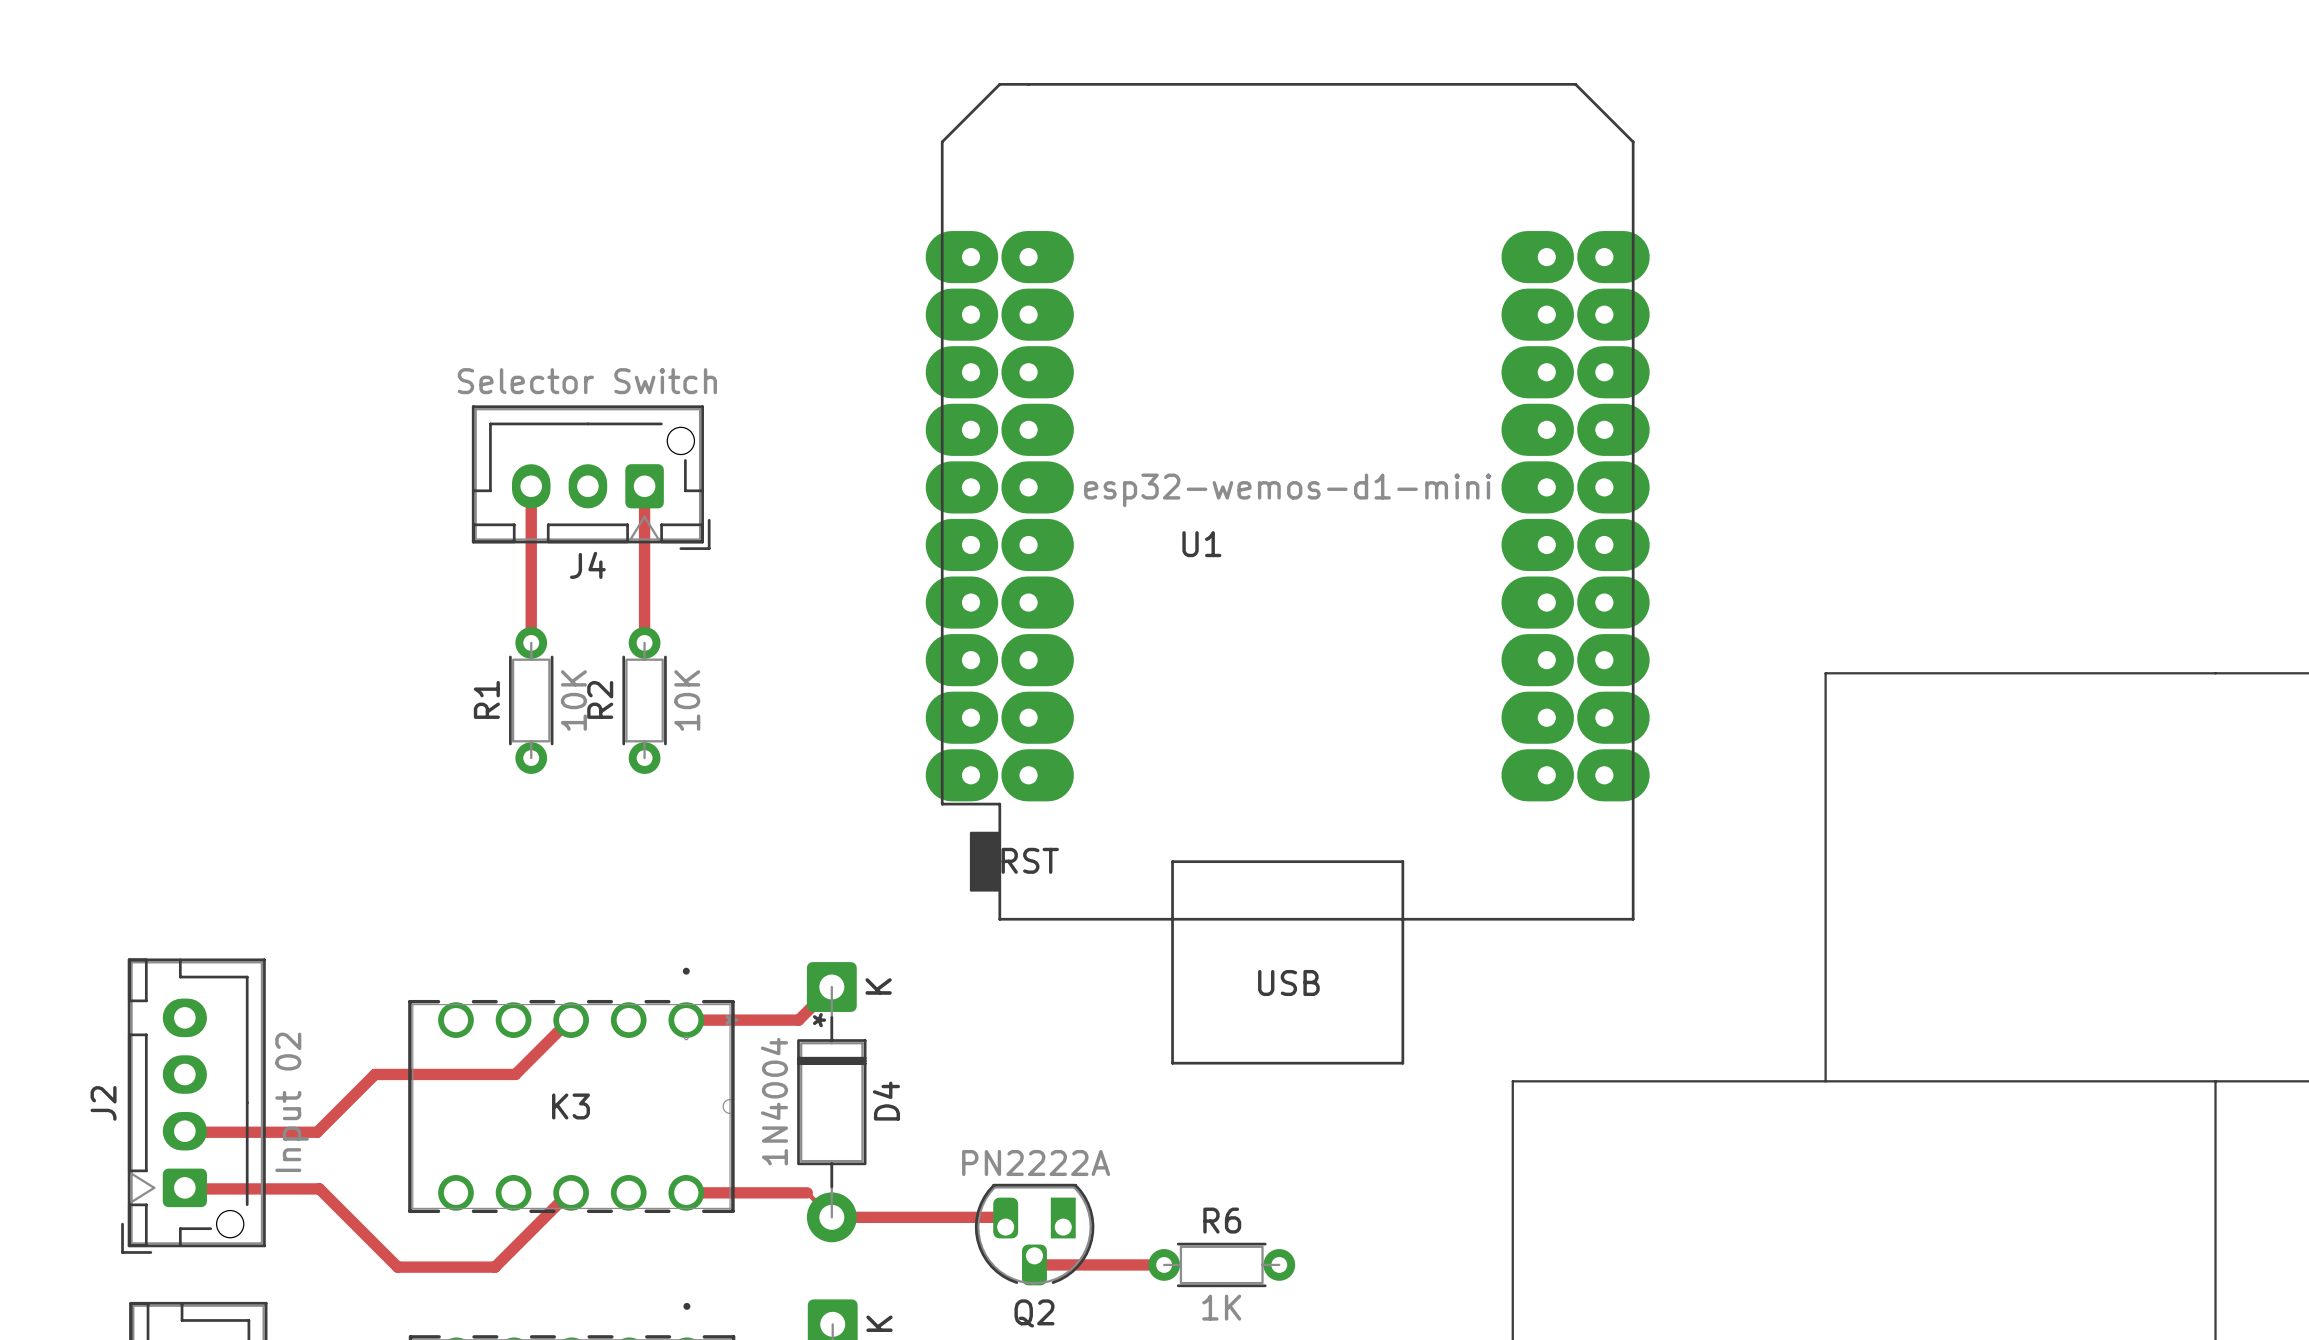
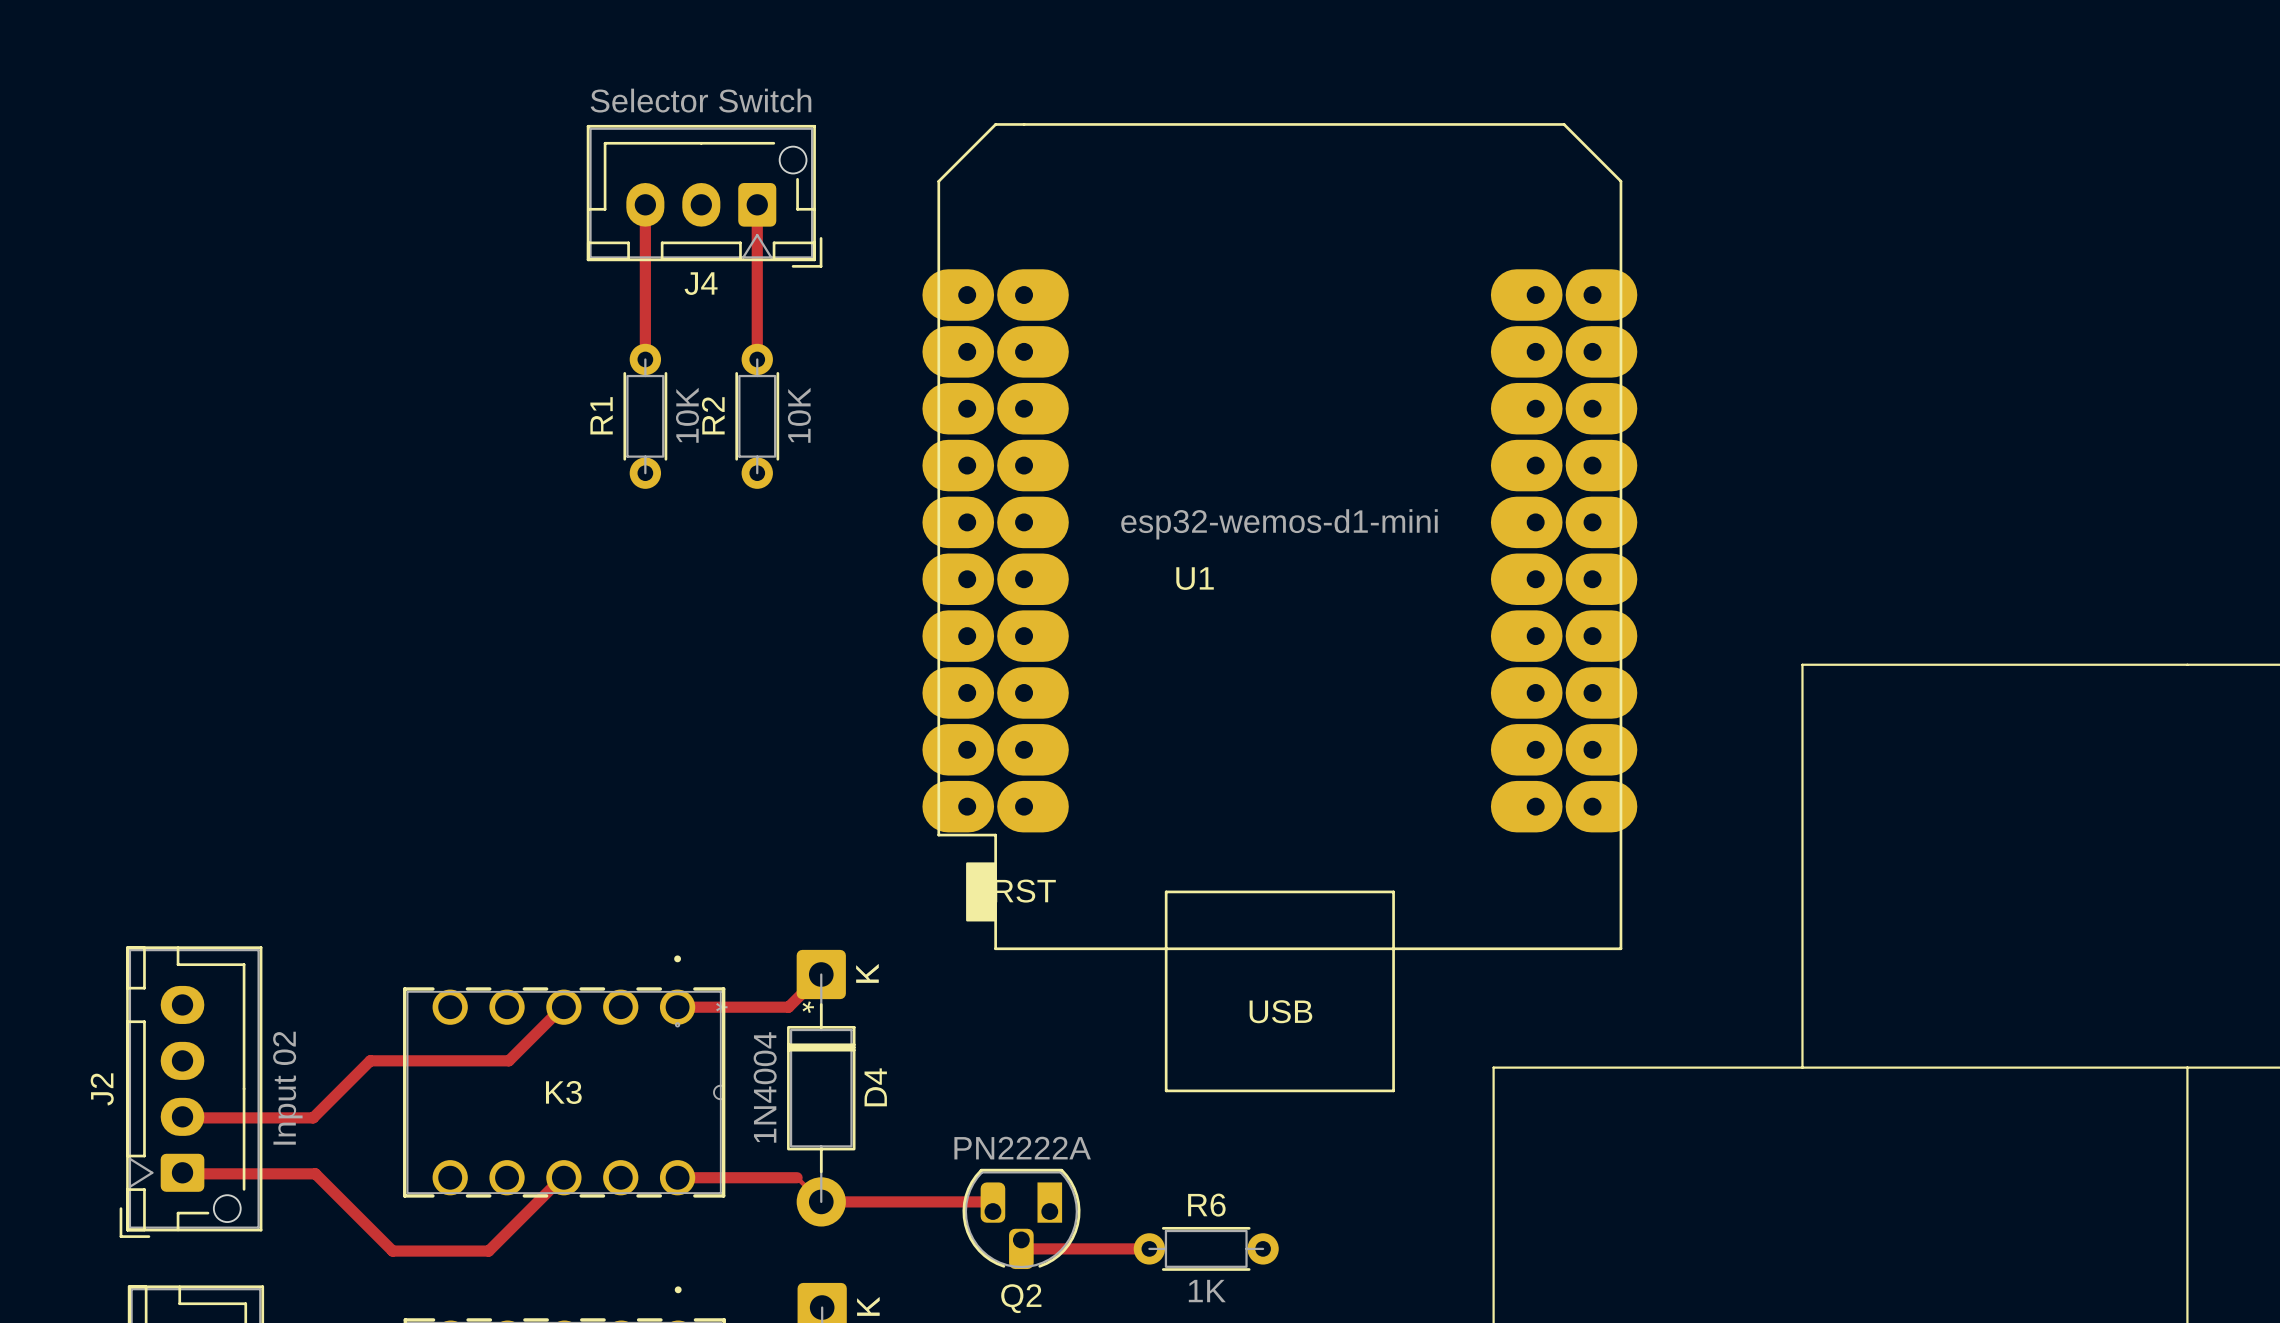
J4 position: (591, 477) -> (704, 196)
top track: (531, 486) (531, 642) -> (757, 204) (757, 359)
top track: (644, 486) (644, 642) -> (645, 204) (645, 359)
U1 position: (1287, 573) -> (1279, 607)
R1 position: (531, 700) -> (645, 416)
R2 position: (644, 700) -> (757, 416)

